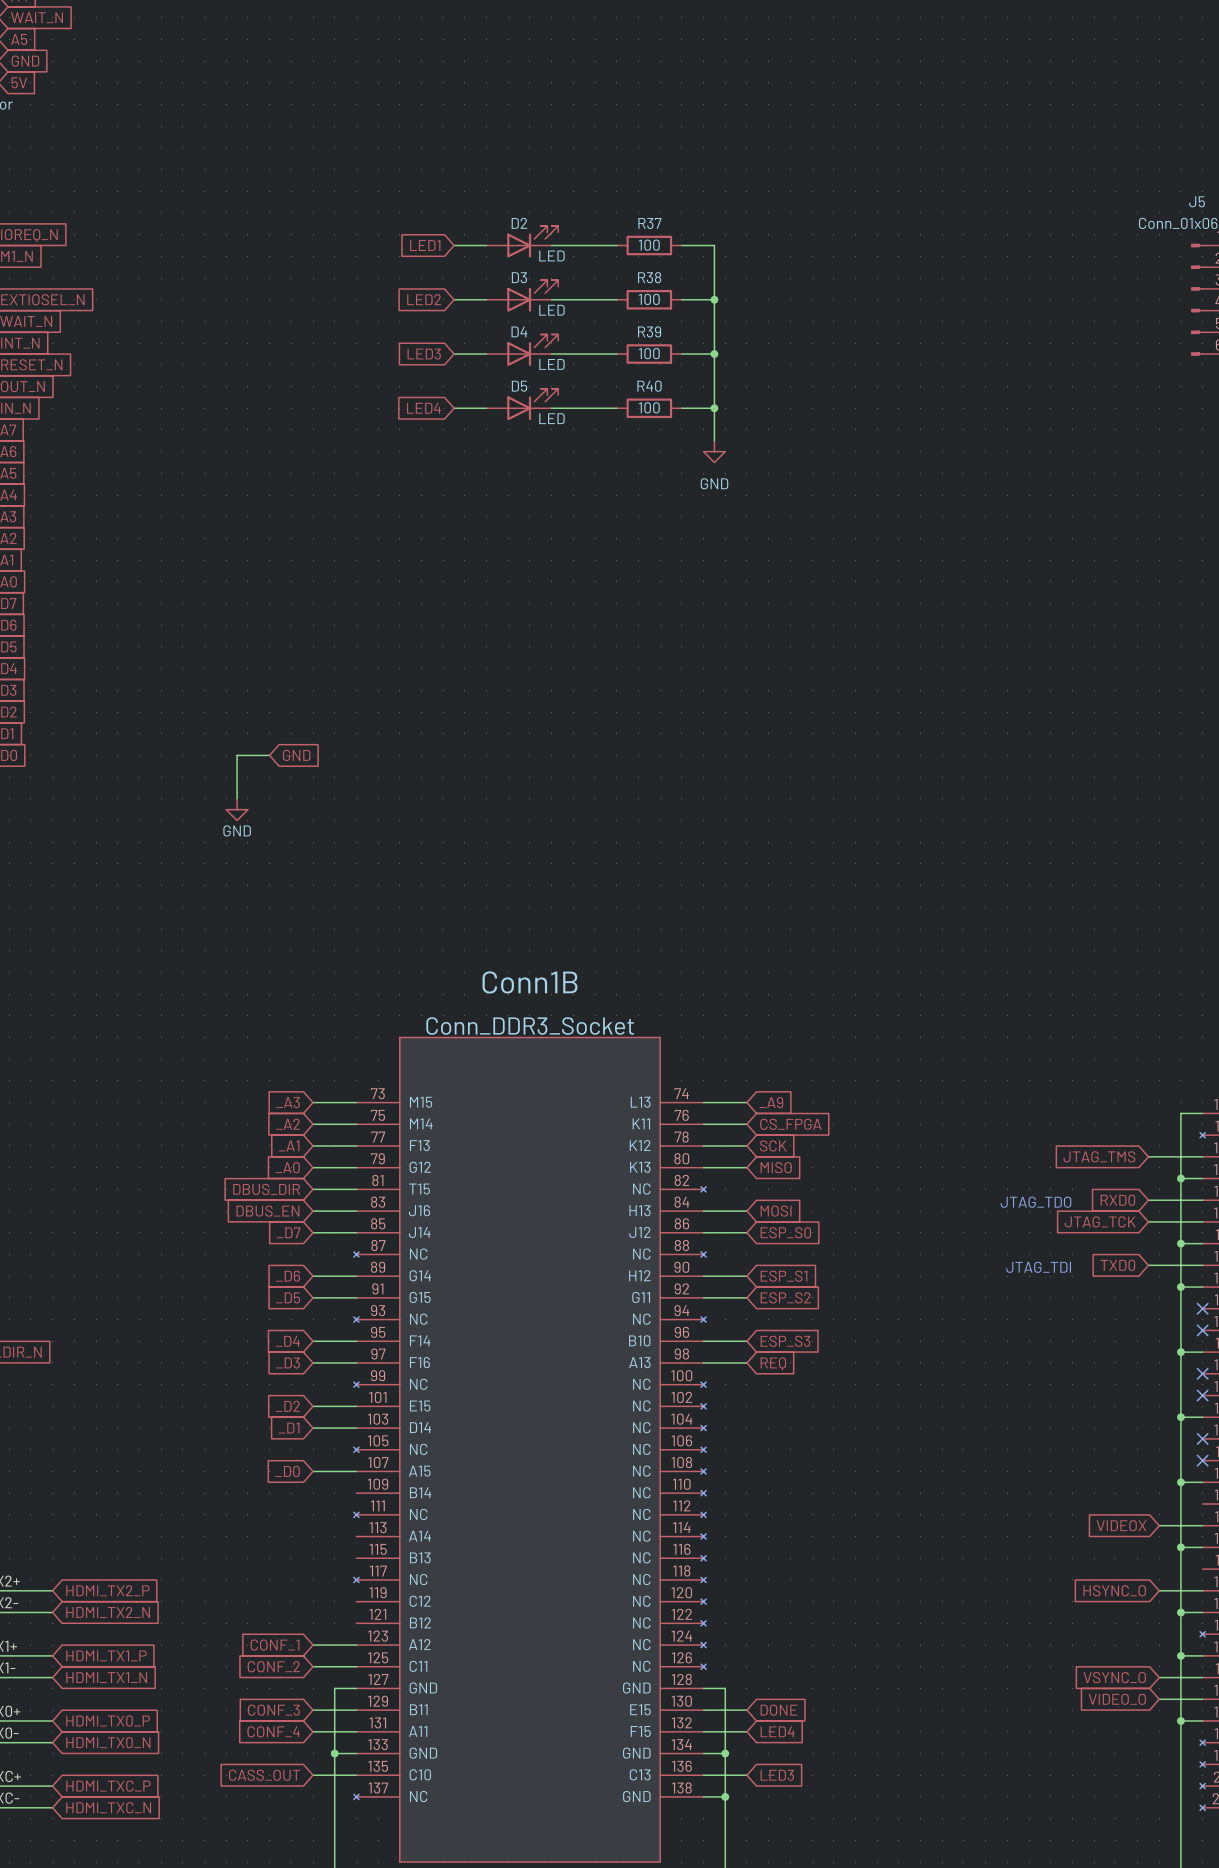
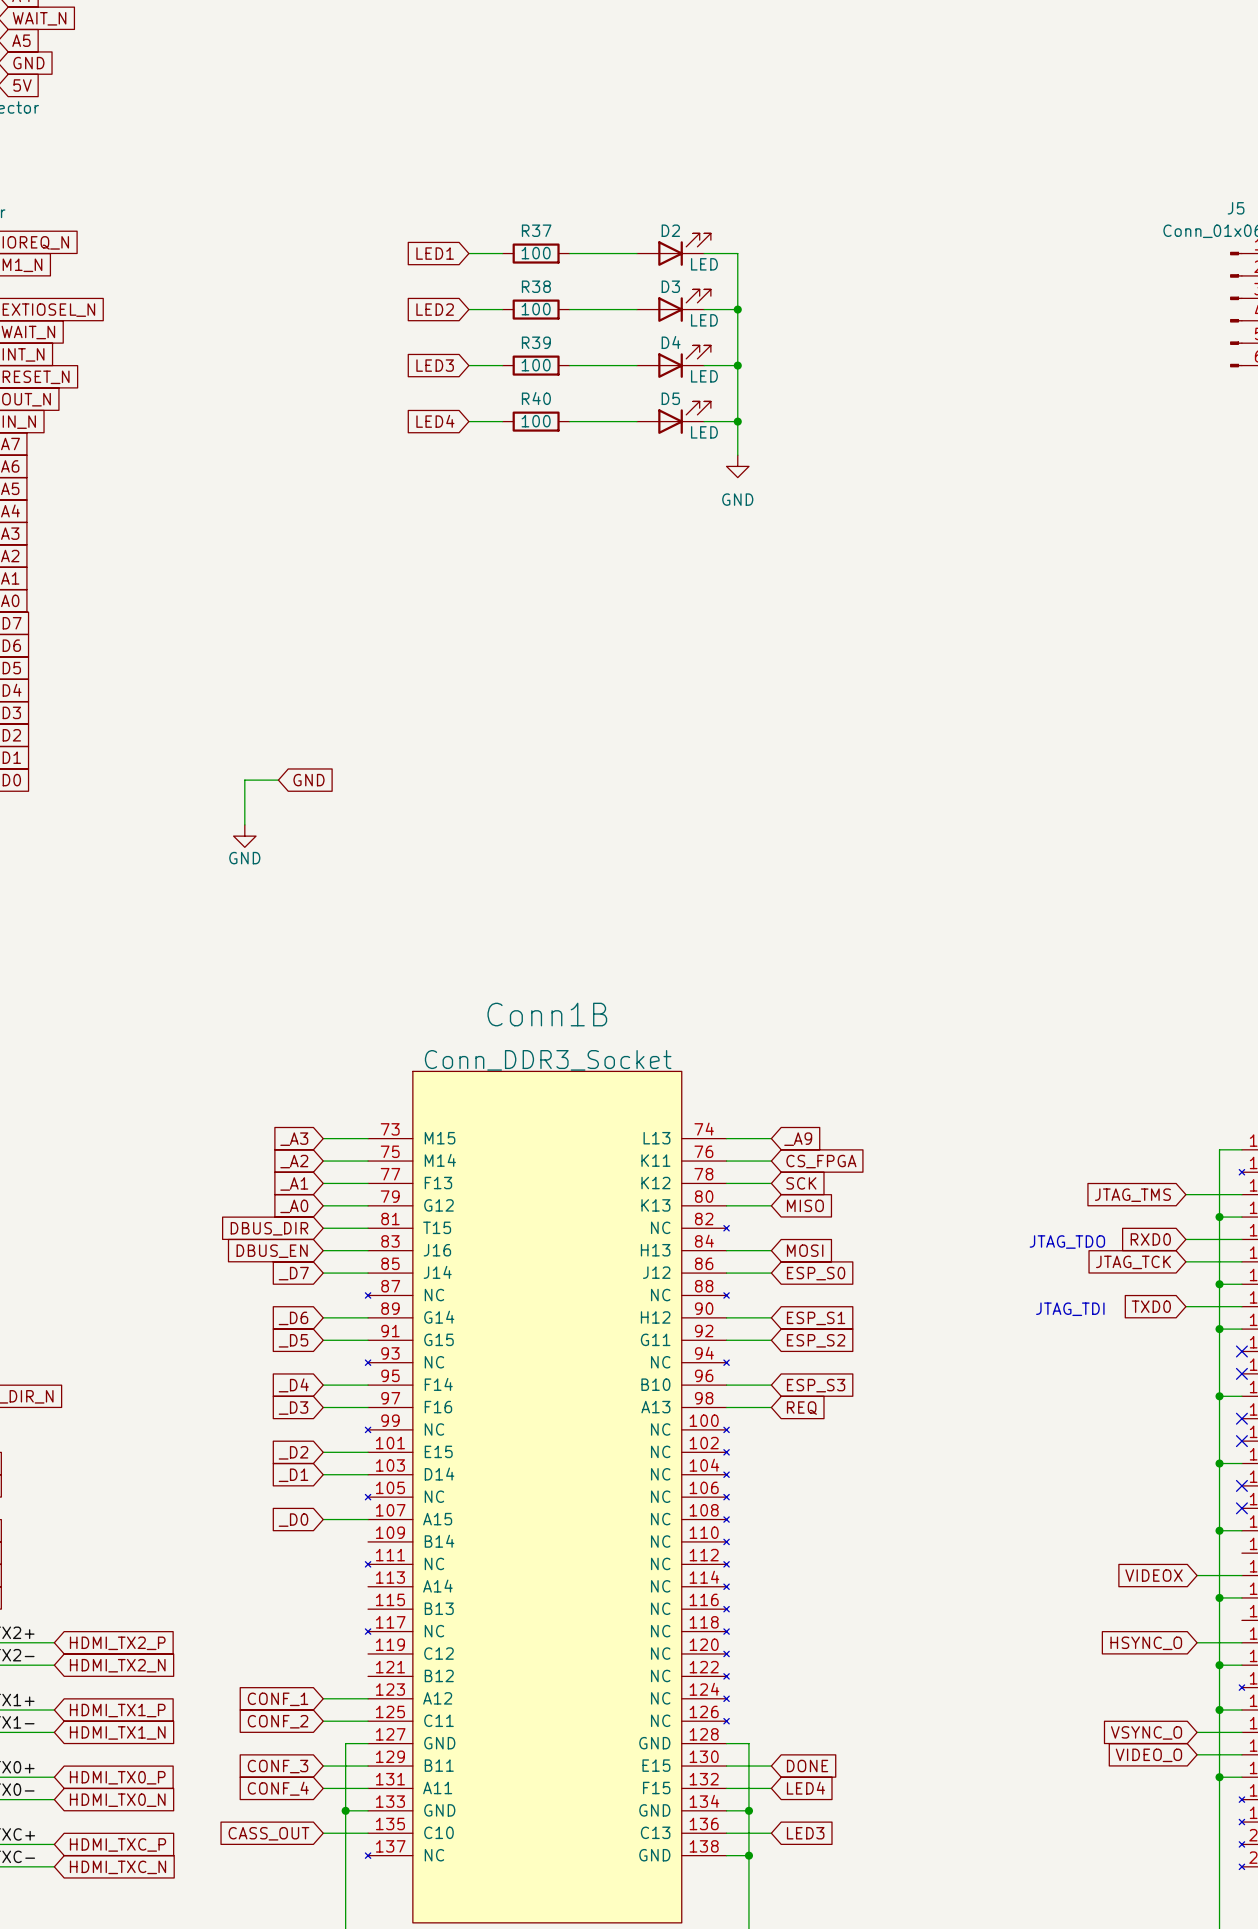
D2 position: (522, 241) -> (673, 249)
R37 position: (649, 245) -> (536, 253)
D3 position: (522, 295) -> (673, 305)
R38 position: (649, 299) -> (536, 309)
D4 position: (522, 350) -> (673, 361)
R39 position: (649, 354) -> (536, 365)
D5 position: (522, 404) -> (673, 417)
R40 position: (649, 408) -> (536, 421)

